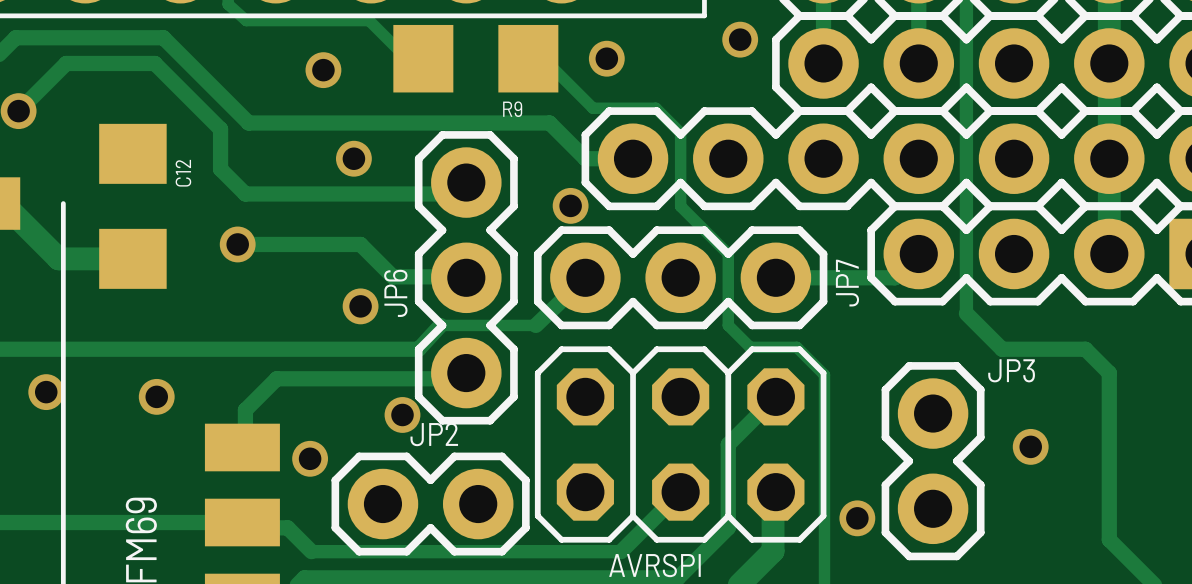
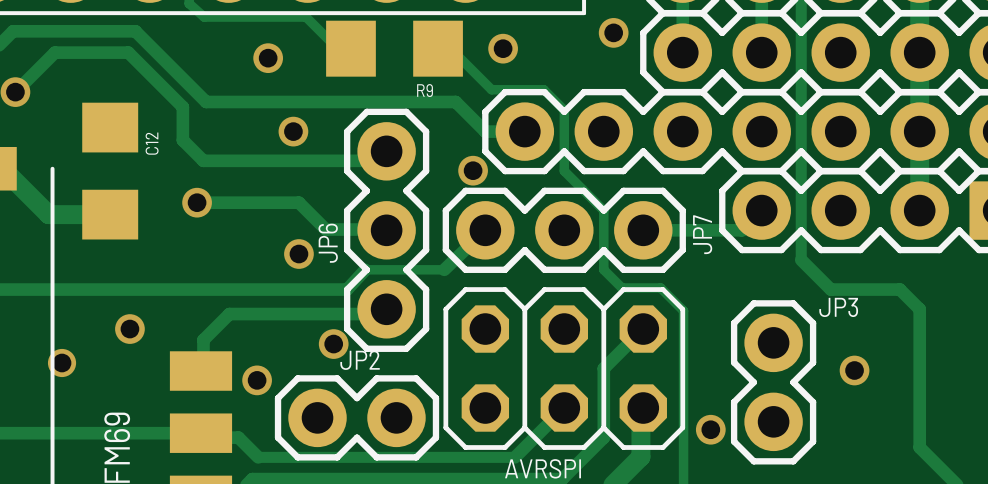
via: (46, 392) -> none
via: none -> (62, 363)

